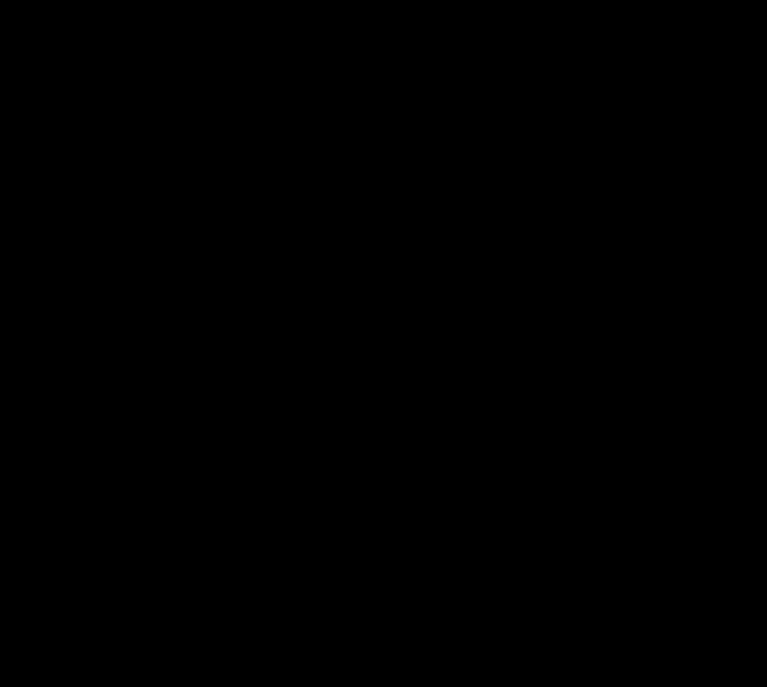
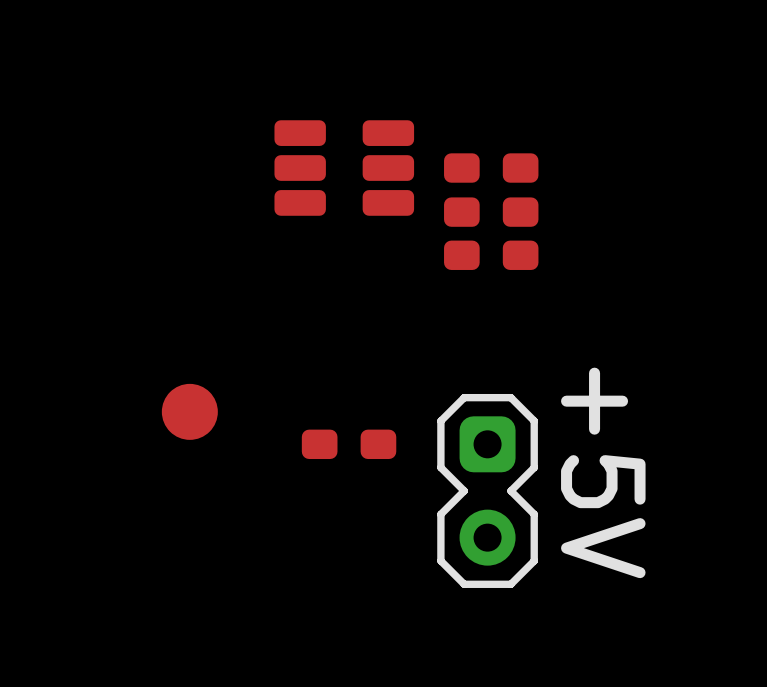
part: none -> (344, 168)
part: none -> (491, 168)
part: none -> (491, 212)
part: none -> (491, 255)
part: none -> (189, 411)
part: none -> (349, 444)
text: none -> +5V (603, 472)
part: none -> (487, 490)

